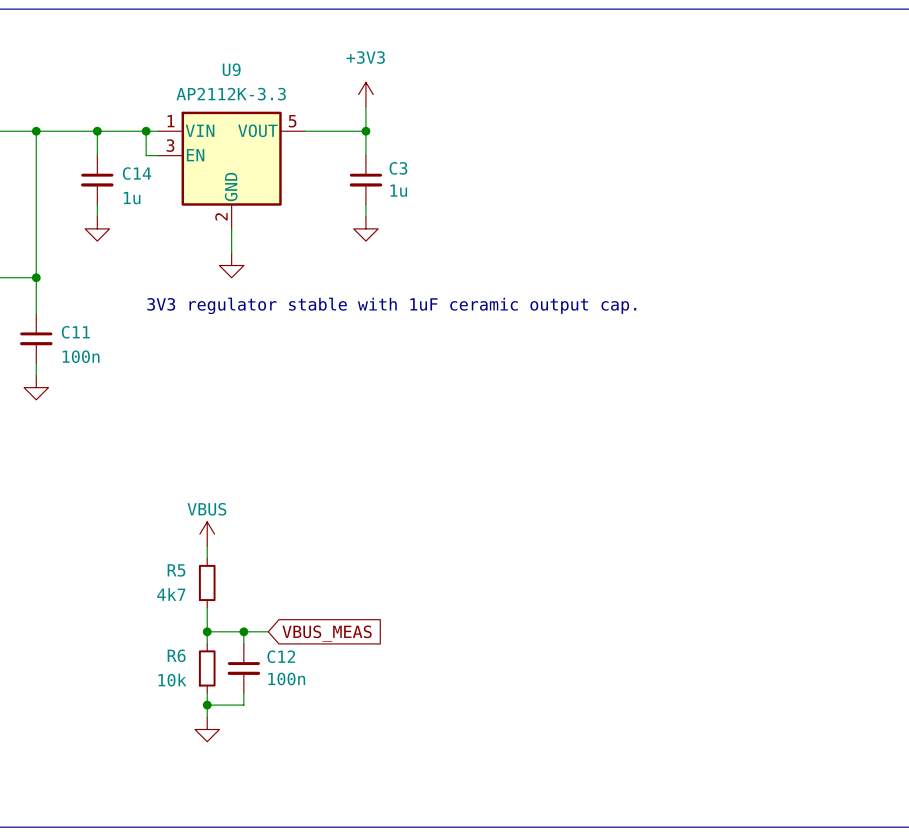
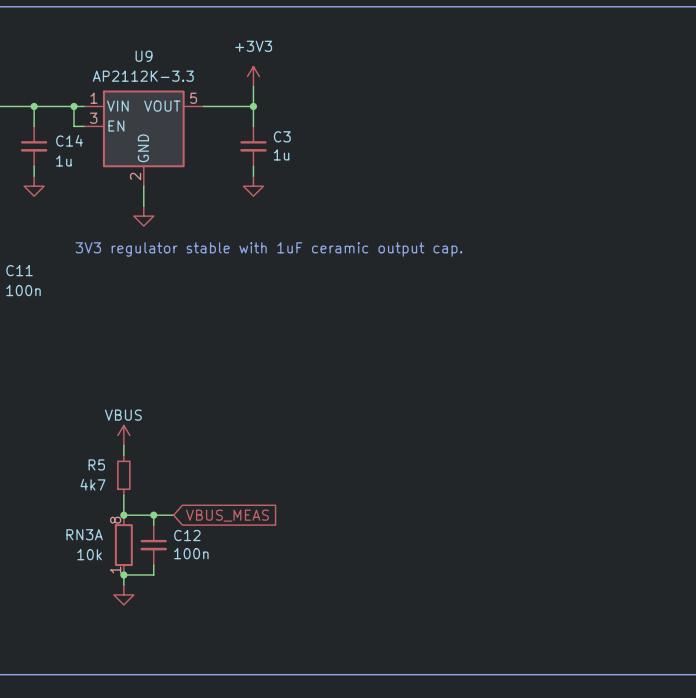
R6: 10k (207, 668) -> none
RN3A: none -> 10k (123, 545)

